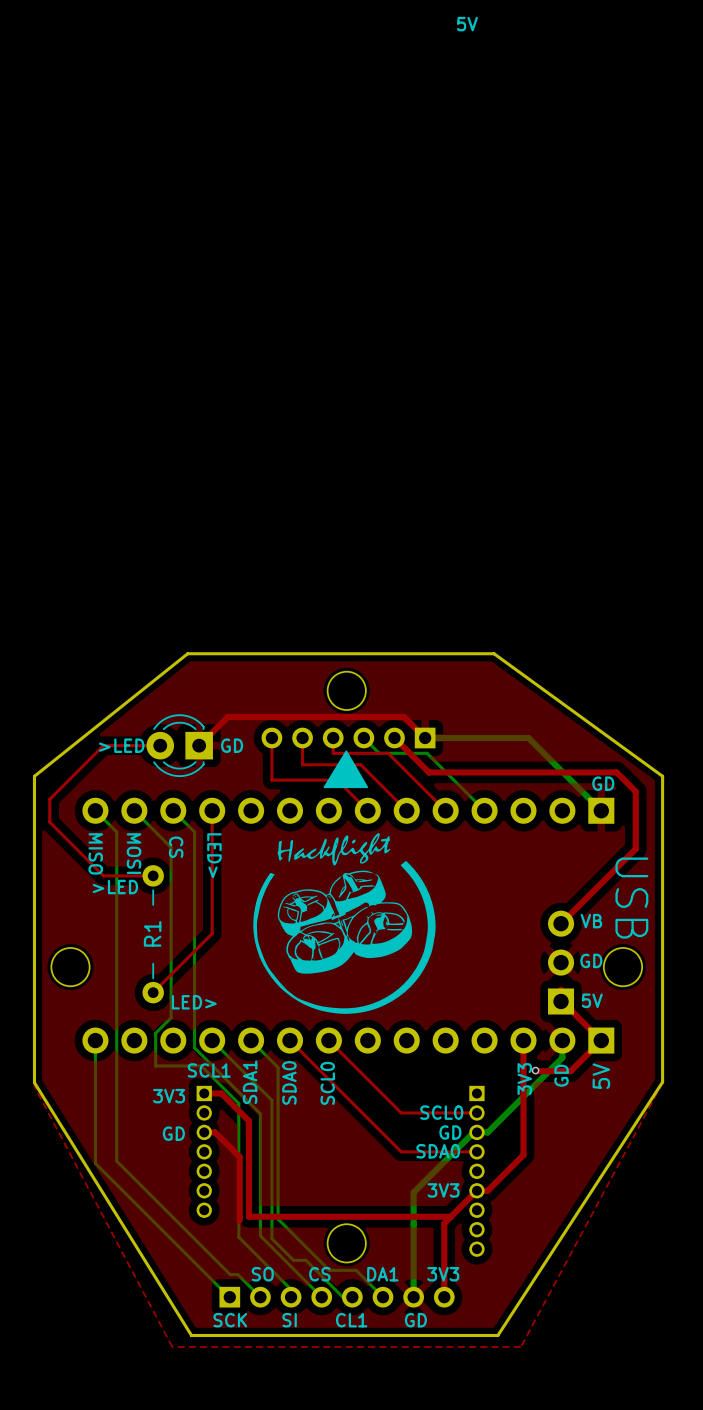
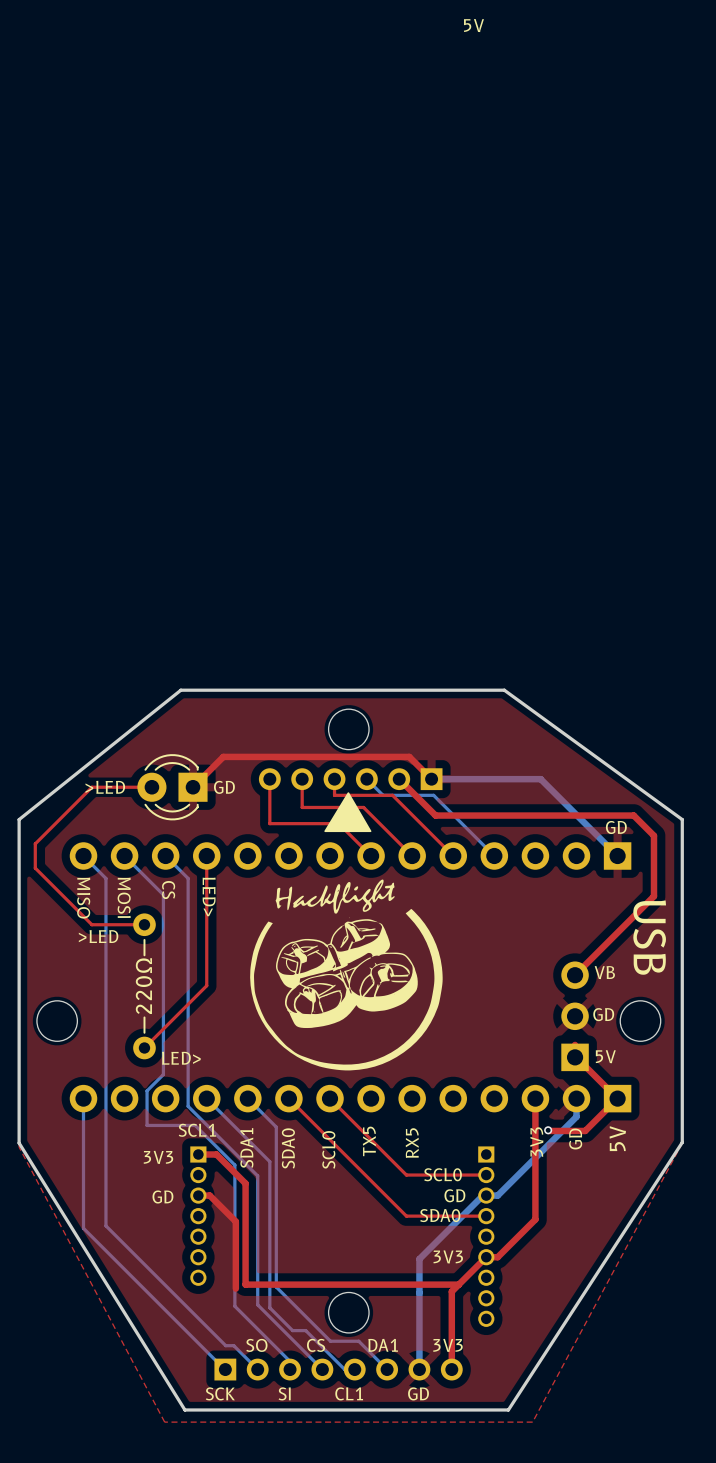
R1 name: R1 (152, 933) -> 220Ω (143, 986)
text: none -> TX5 (369, 1141)
text: none -> RX5 (412, 1143)

